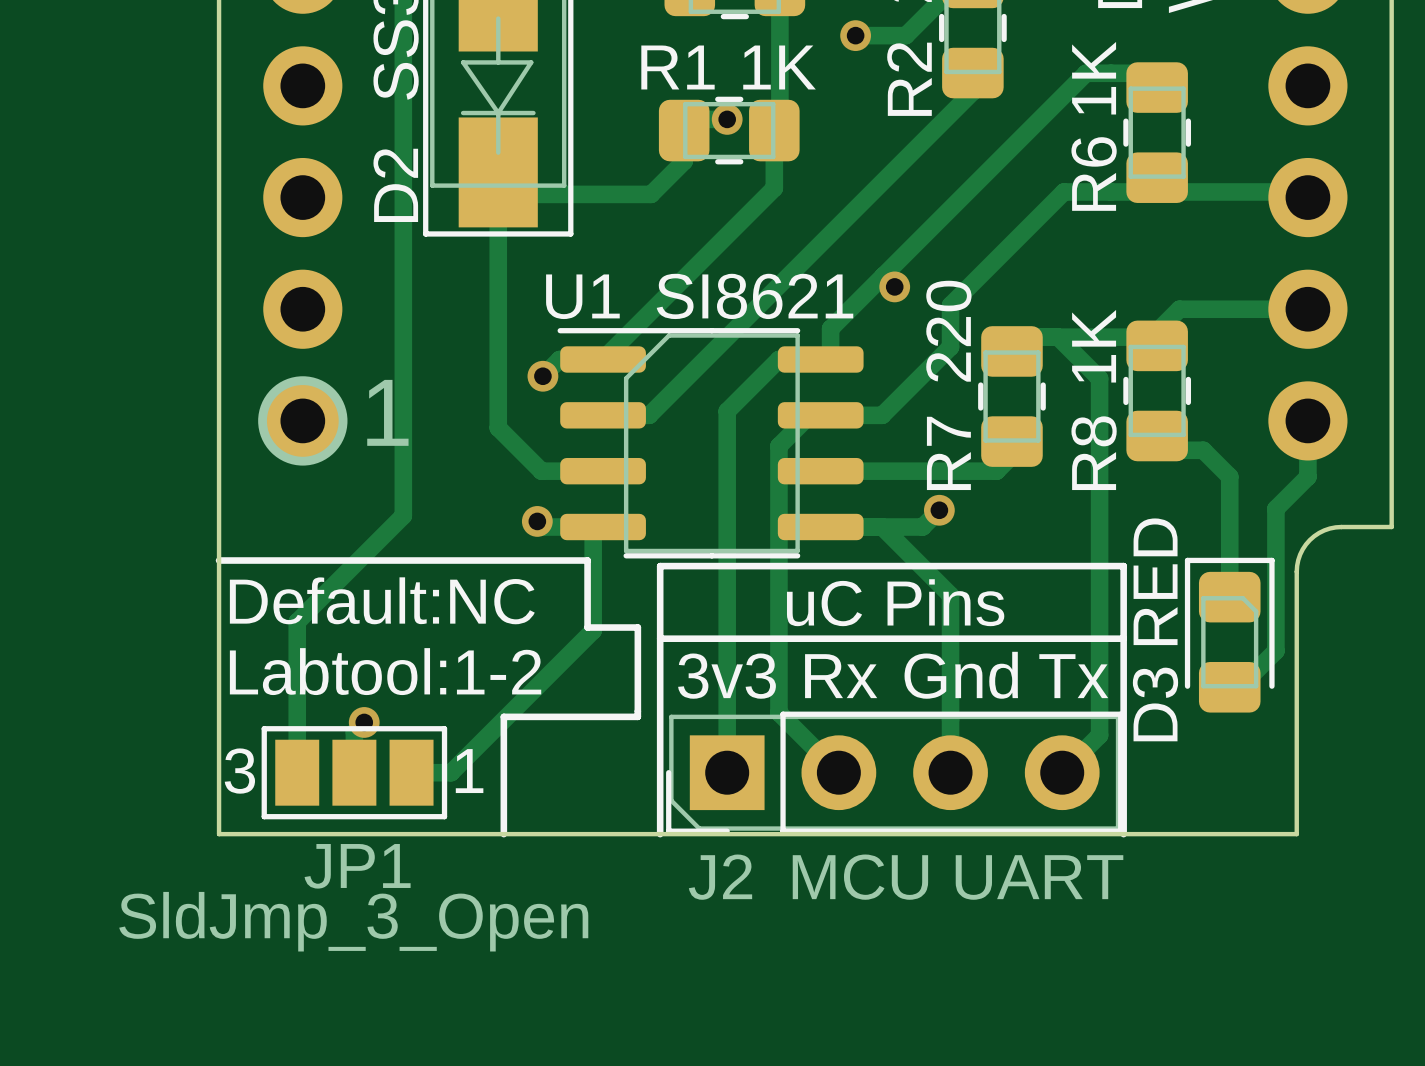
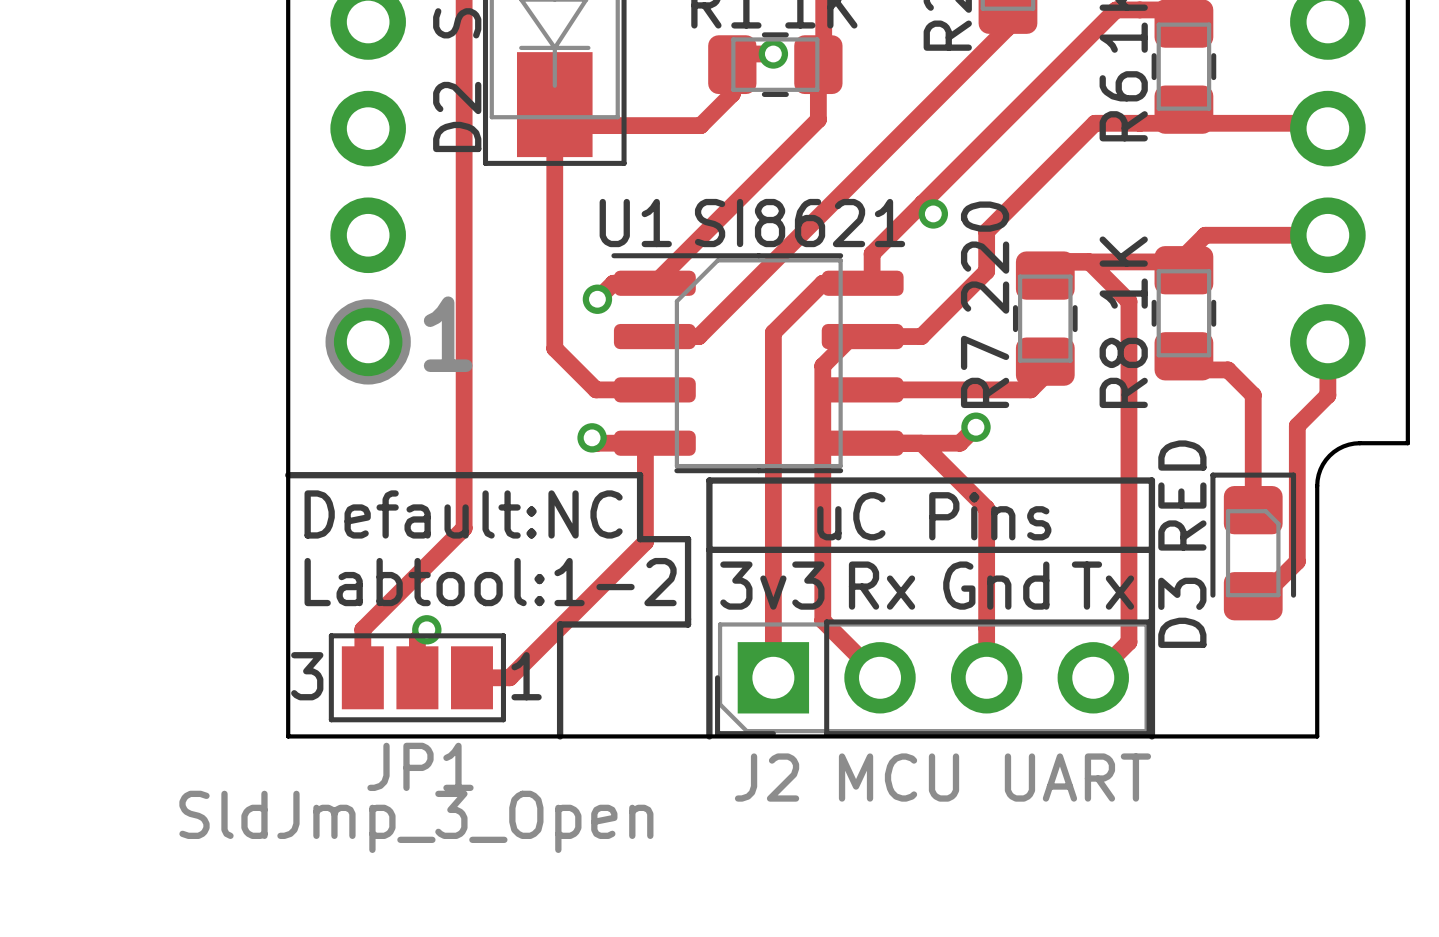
track: (403, 515) (297, 621) (297, 722) -> (464, 432) (464, 528) (362, 629)

